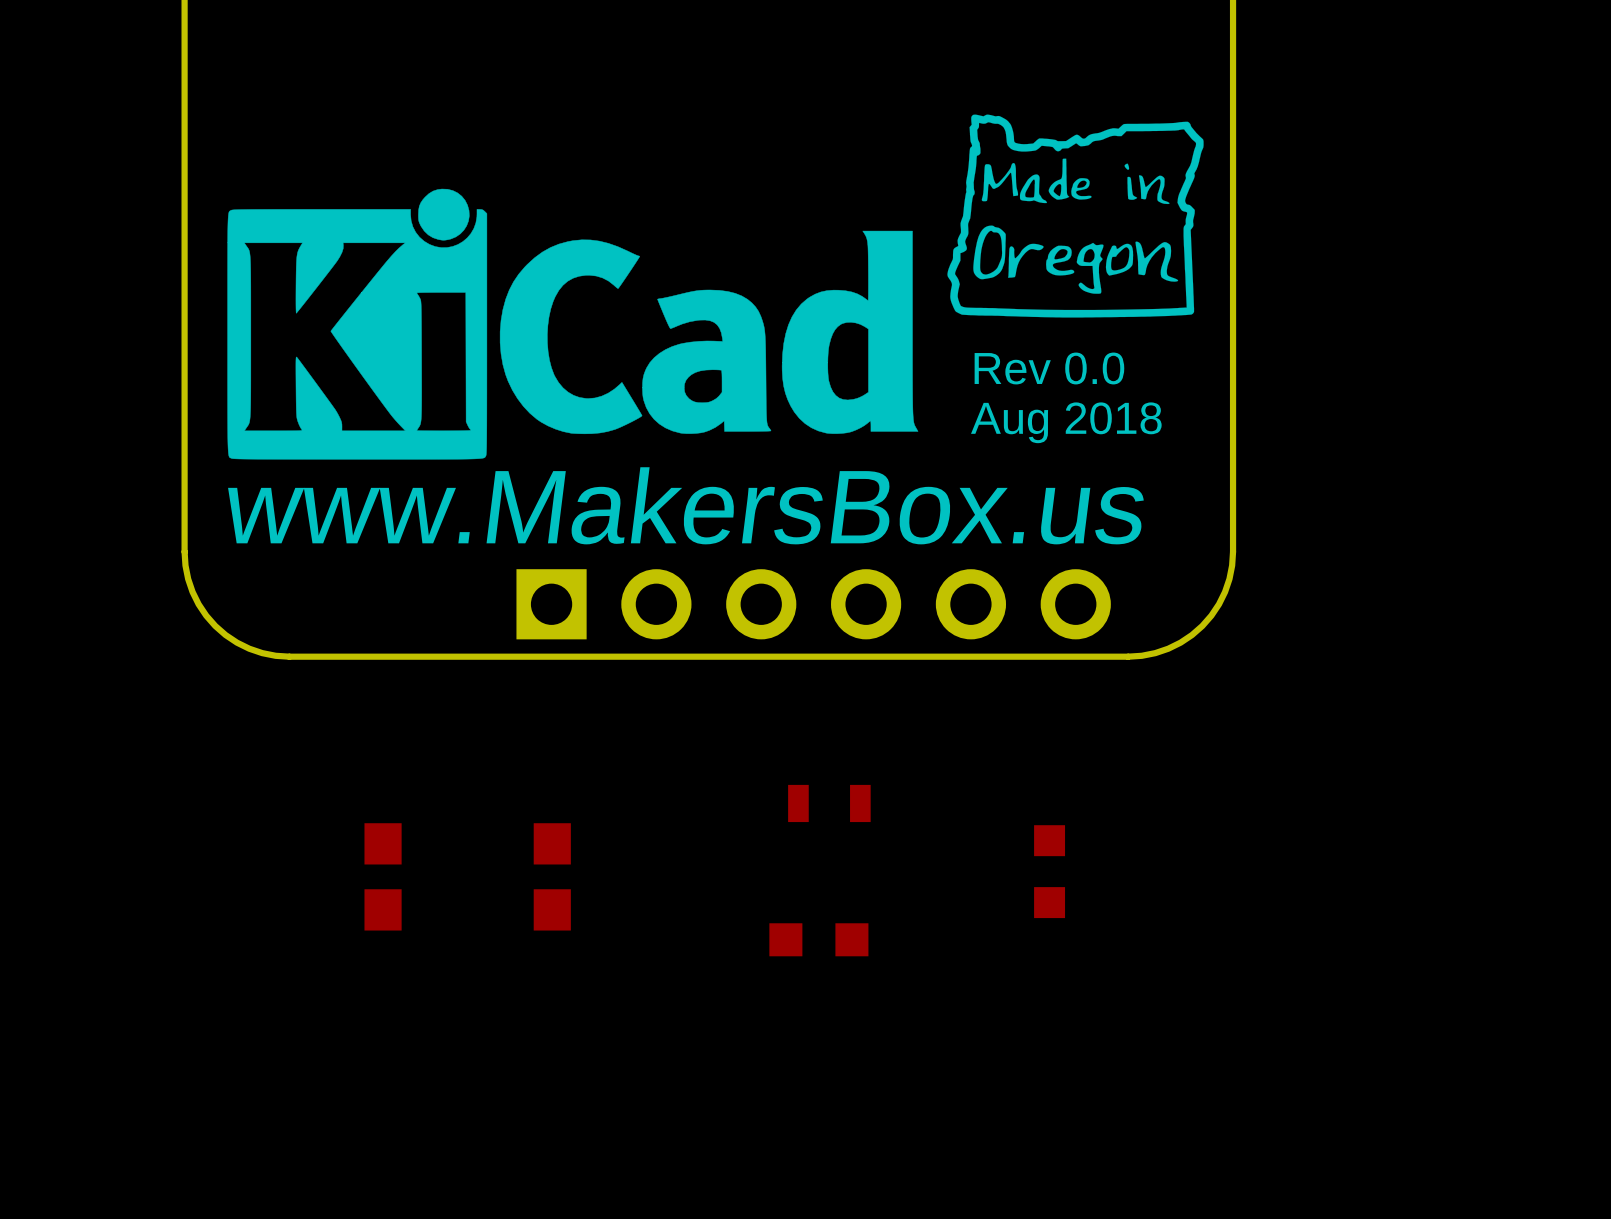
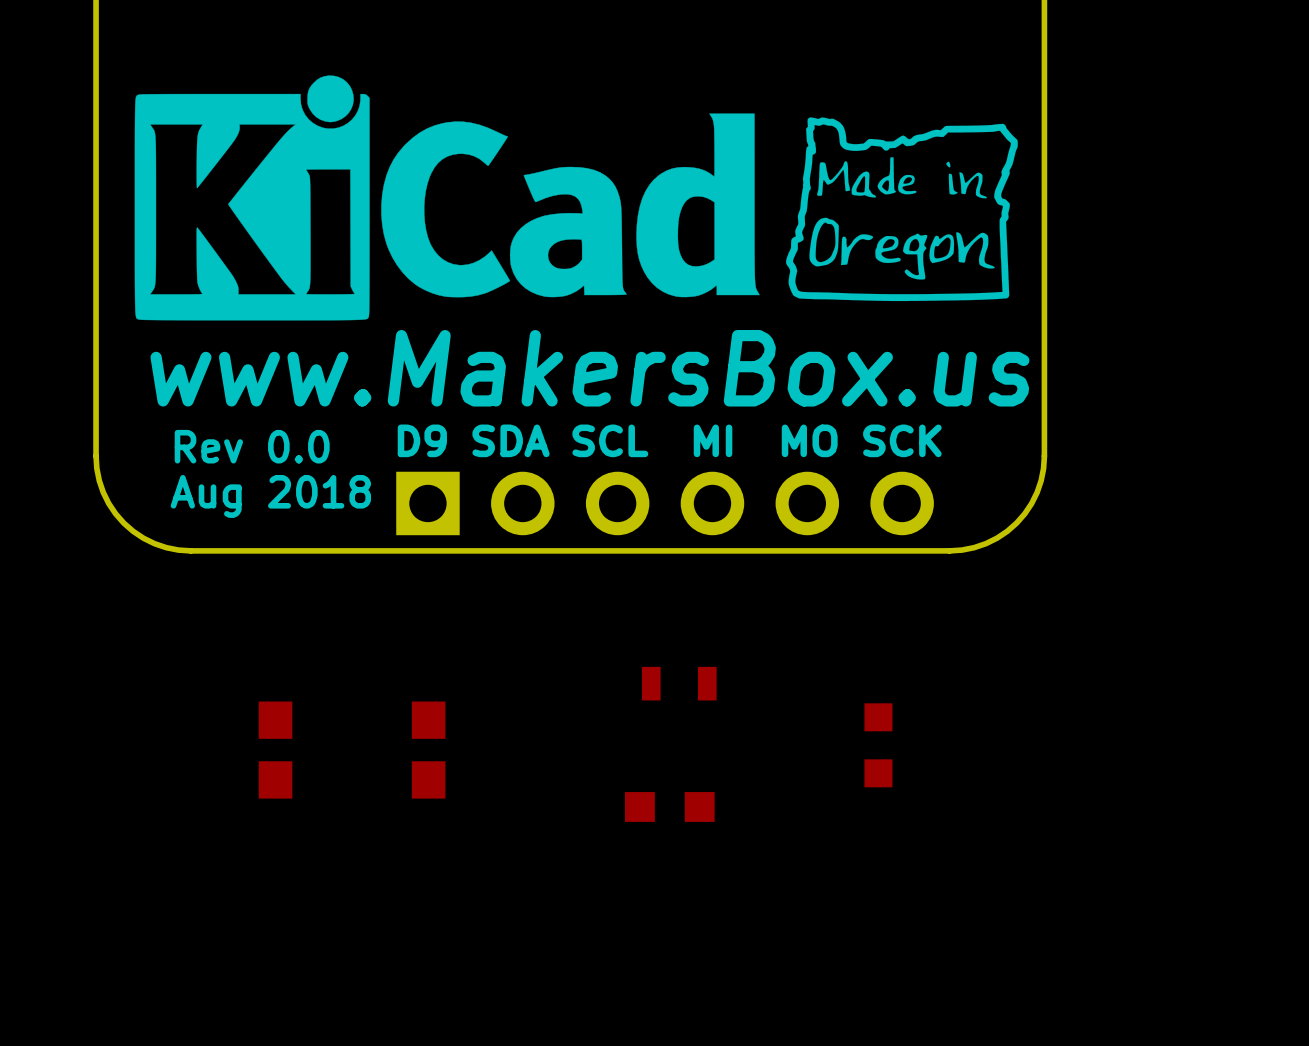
drawing position: (1075, 216) -> (901, 209)
drawing position: (572, 324) -> (447, 197)
text position: Rev 0.0 (1049, 368) -> Rev 0.0 (252, 446)
text position: Aug 2018 (1066, 422) -> Aug 2018 (270, 496)
text position: www.MakersBox.us (685, 505) -> www.MakersBox.us (589, 368)
text: none -> D9 SDA SCL MI MO SCK (669, 440)

